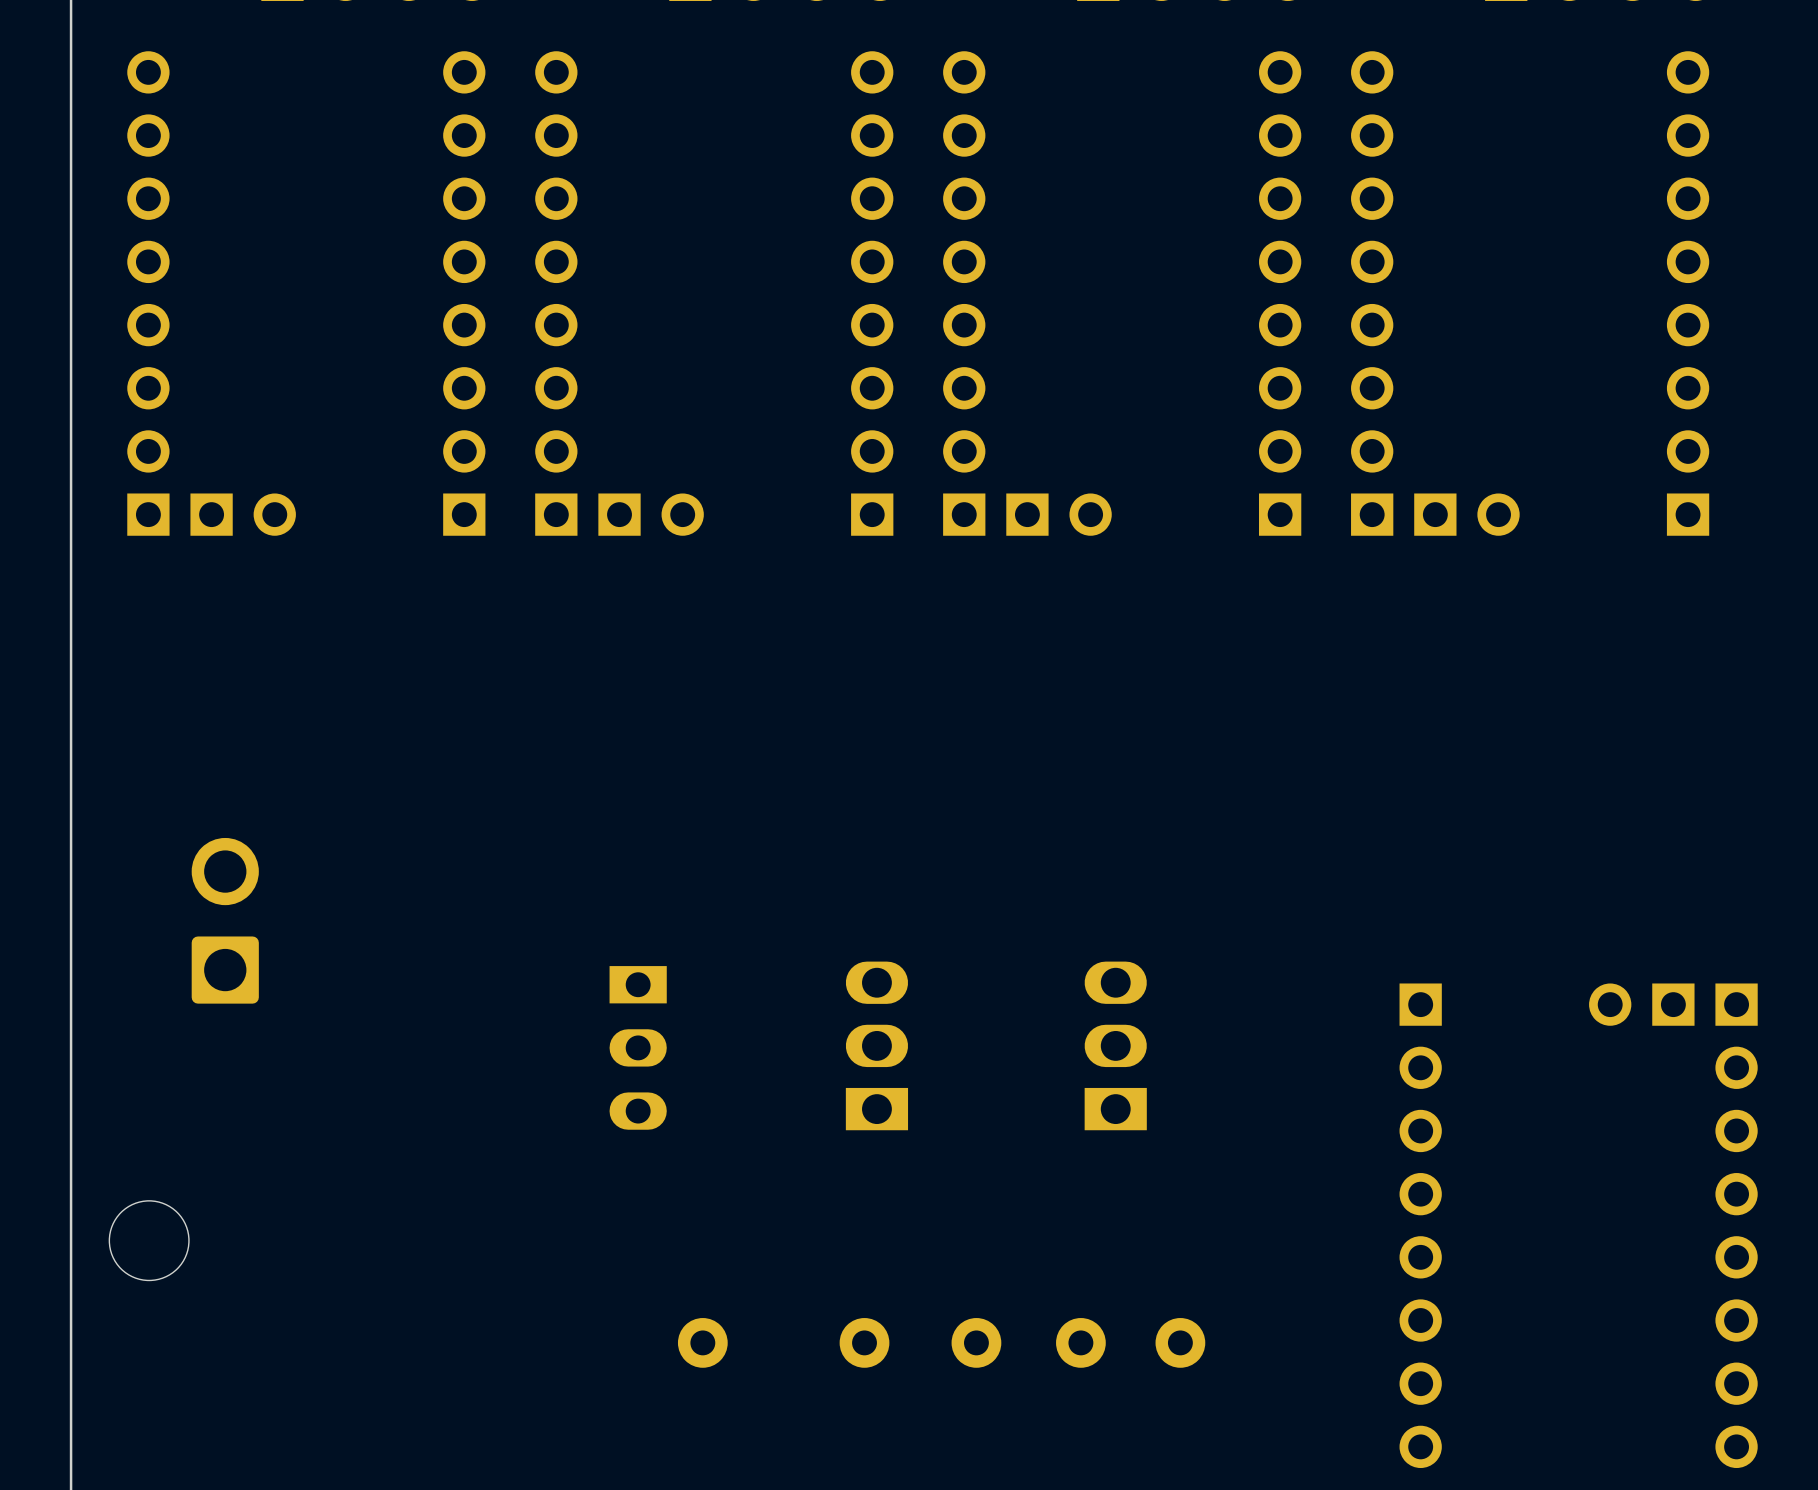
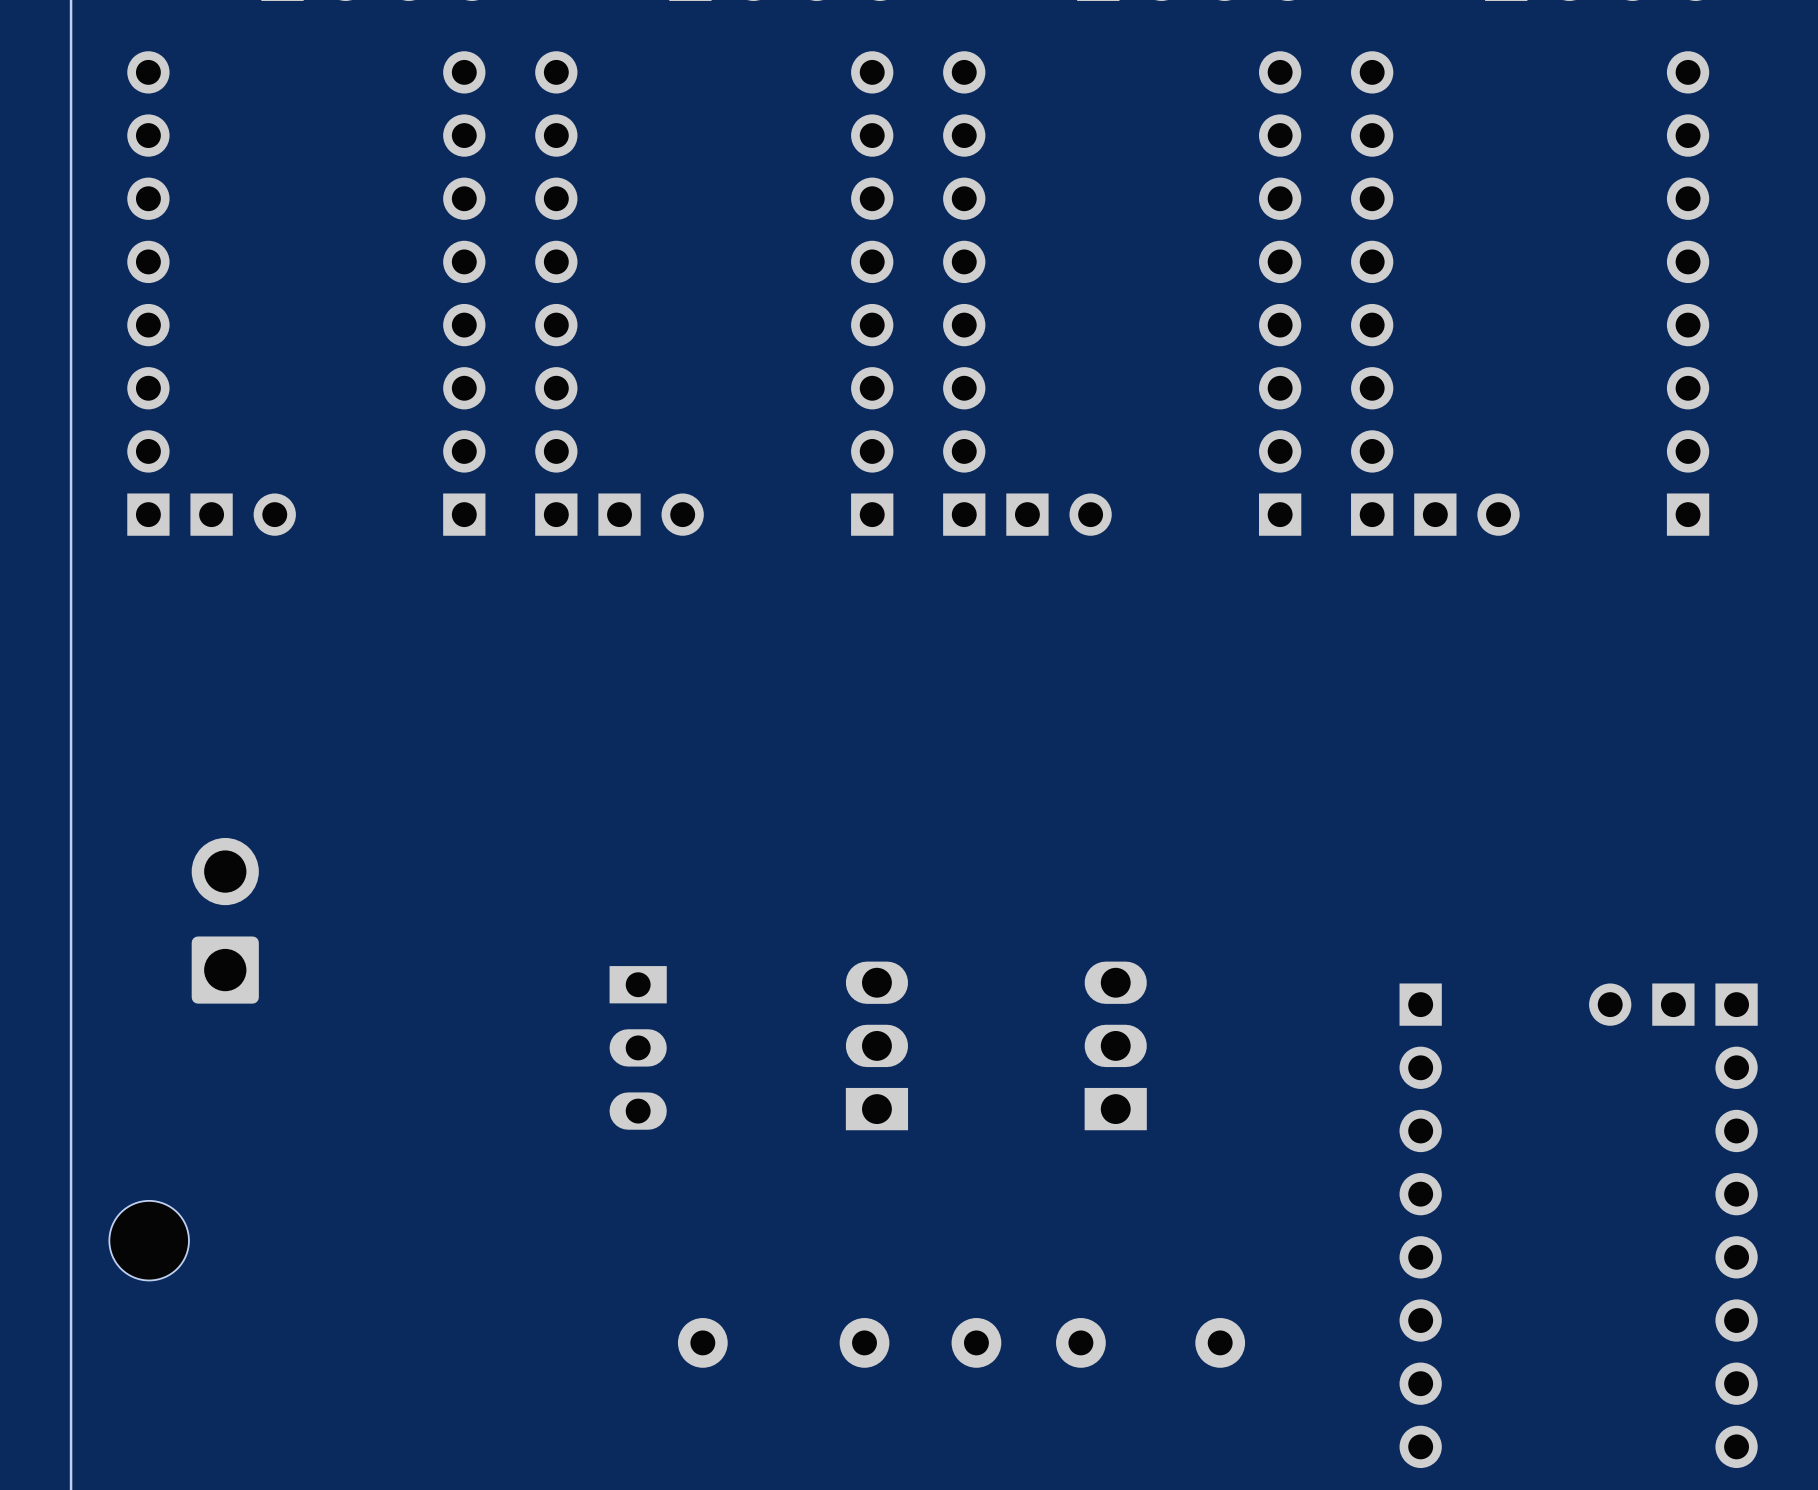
part position: (1180, 1342) -> (1220, 1342)

